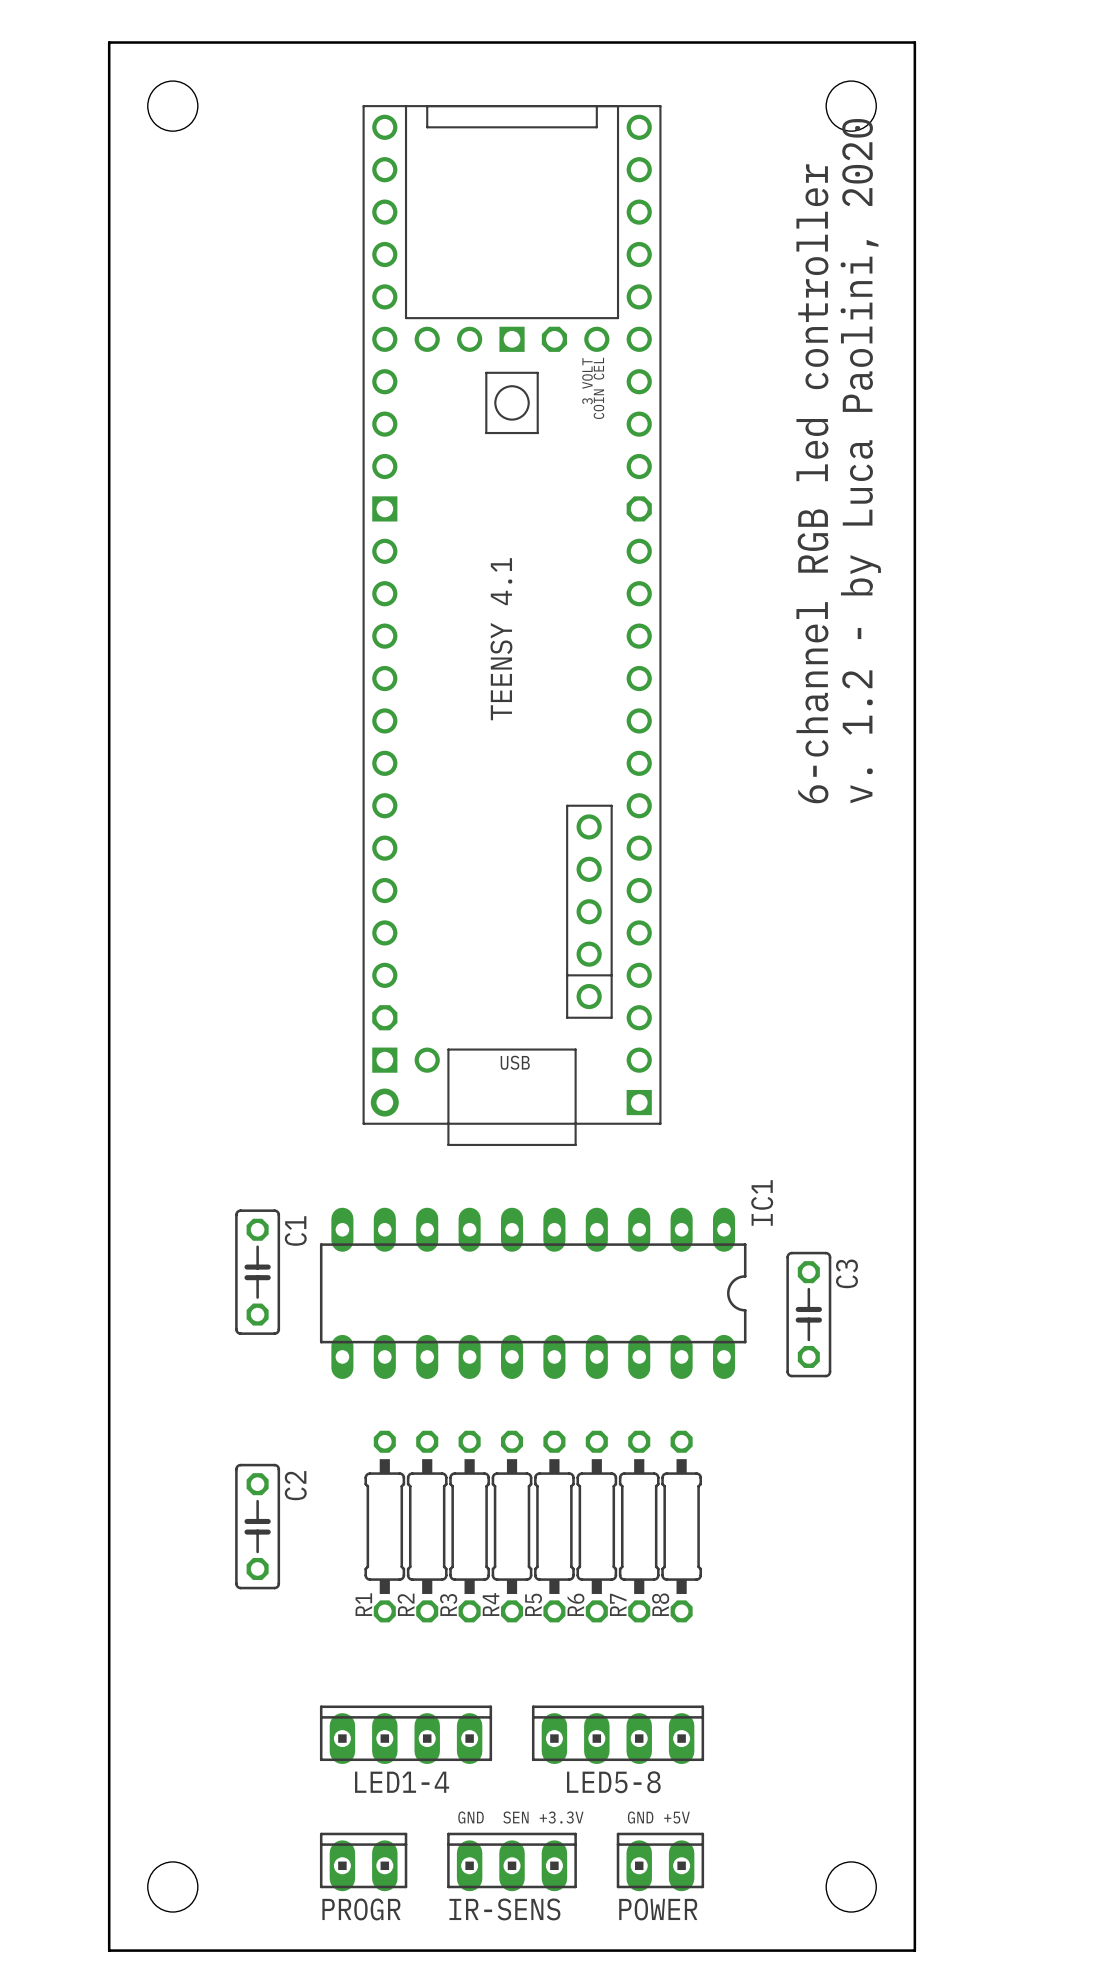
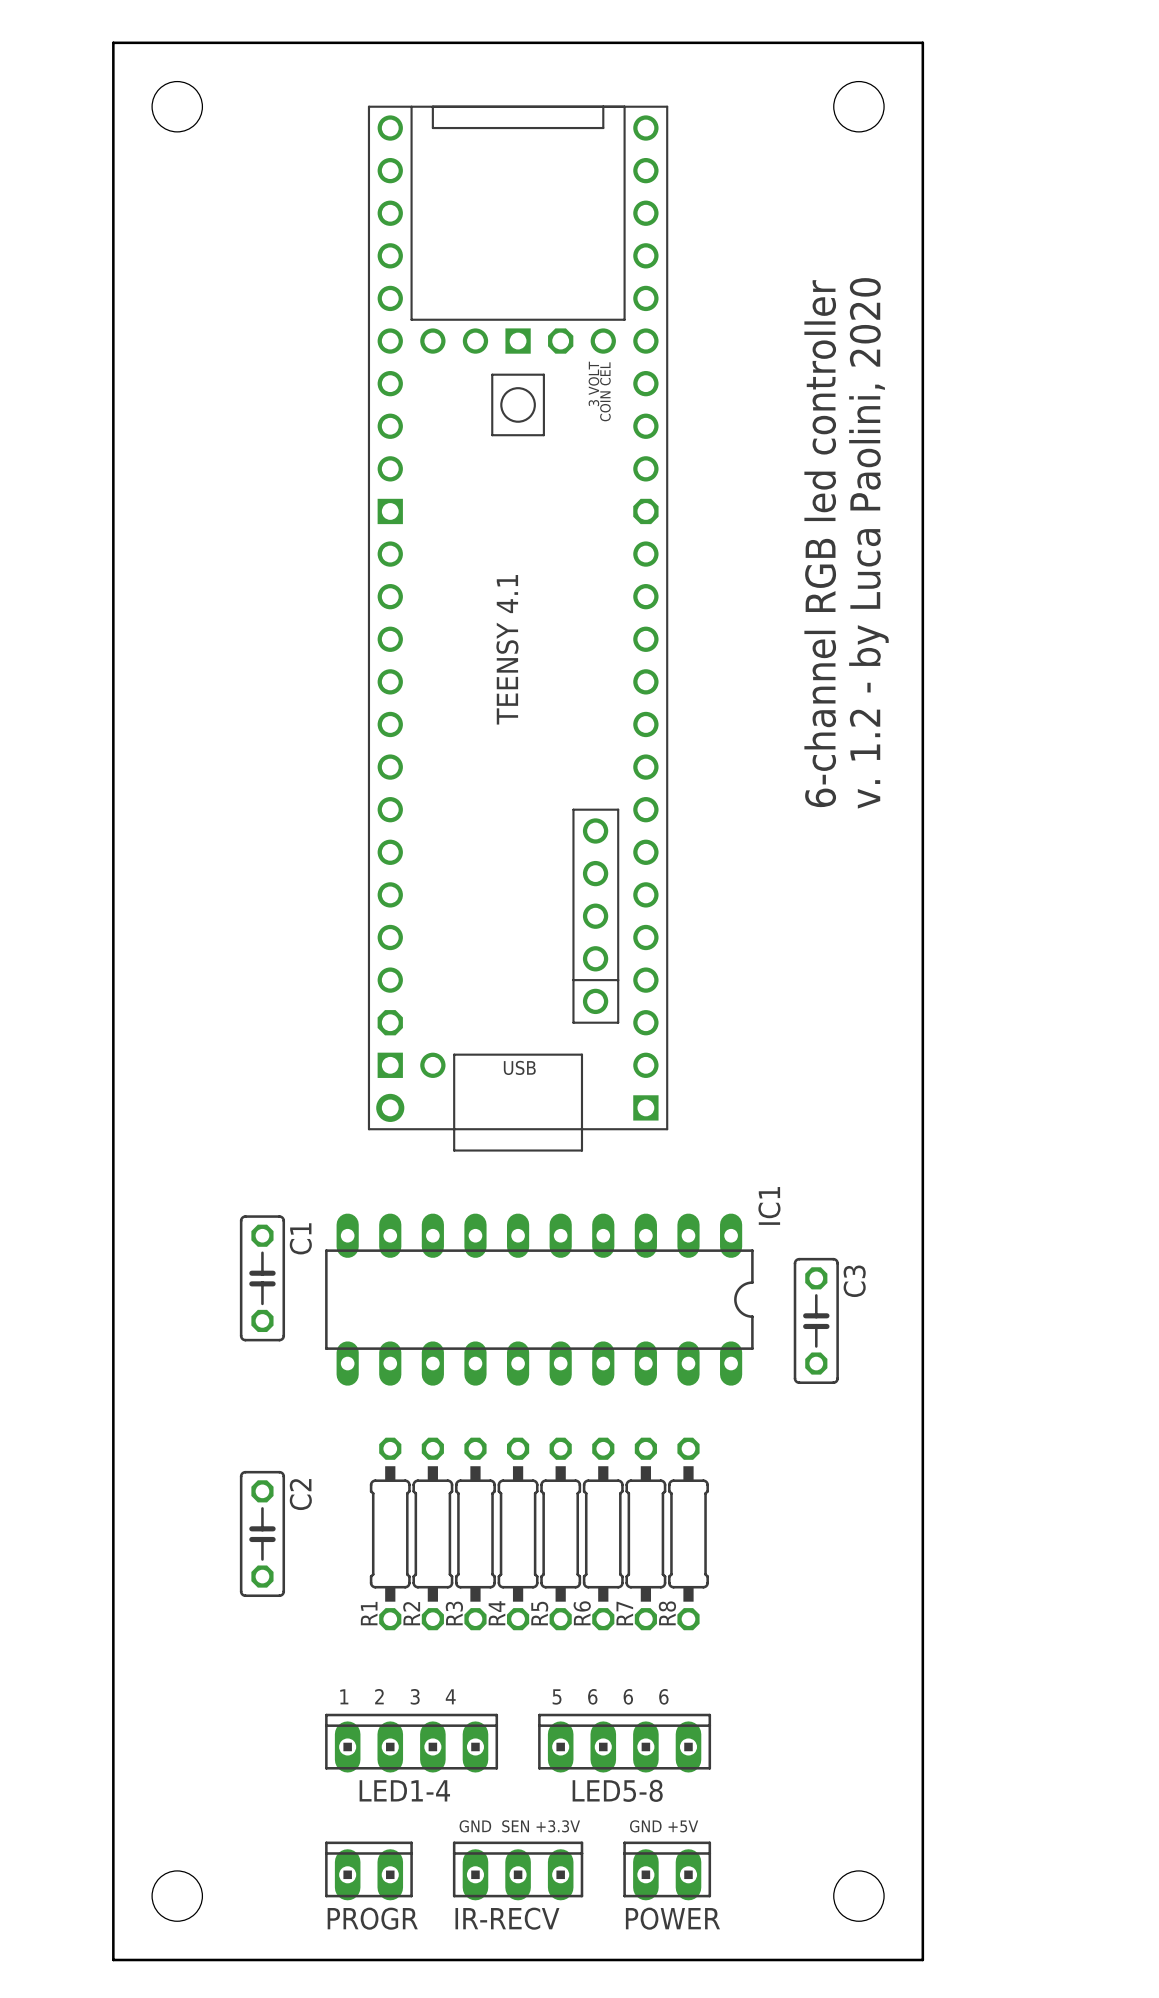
text: none -> 1 2 3 4 (397, 1696)
text: none -> 5 6 6 6 (610, 1696)
IR-SENS name: IR-SENS (504, 1909) -> IR-RECV (507, 1918)

